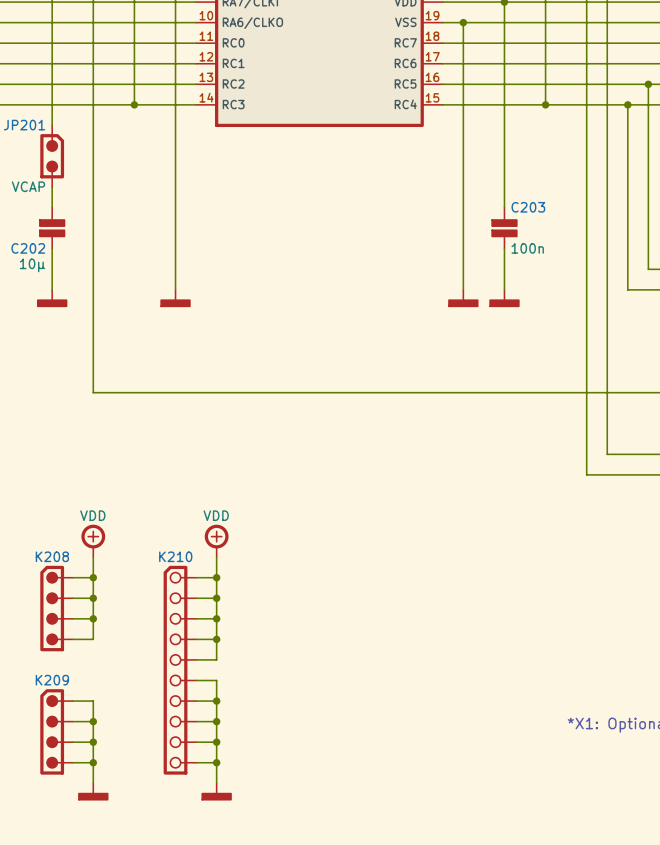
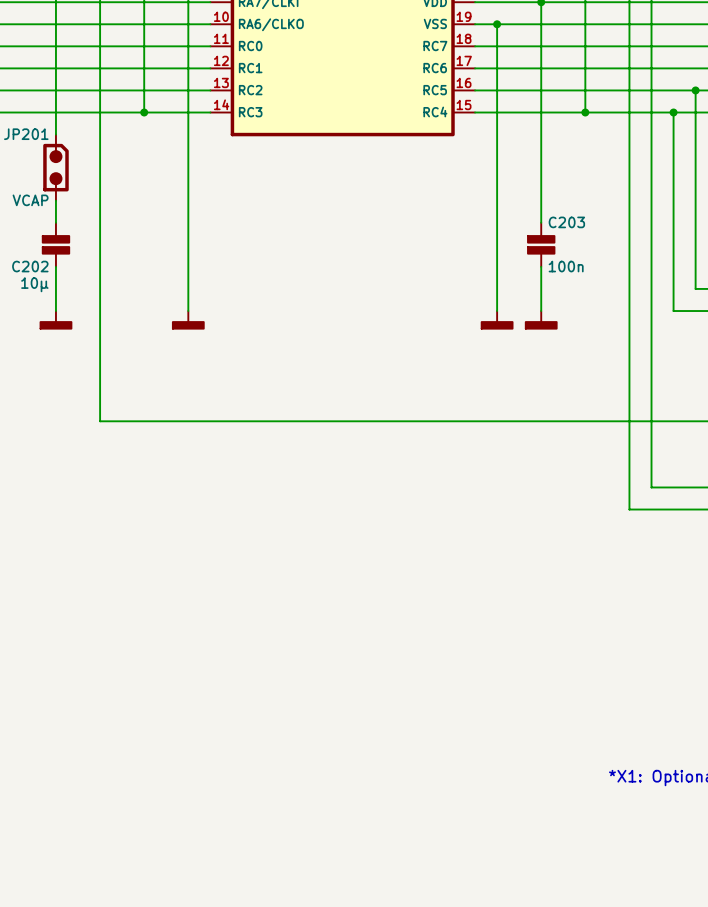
power symbol: (93, 540) -> none
power symbol: (216, 540) -> none
wire: (93, 557) (93, 639) (72, 639) -> none
wire: (216, 557) (216, 659) (196, 659) -> none
wire: (72, 577) (93, 577) -> none
junction: (93, 577) -> none
wire: (196, 577) (216, 577) -> none
junction: (216, 577) -> none
wire: (72, 598) (93, 598) -> none
junction: (93, 598) -> none
wire: (196, 598) (216, 598) -> none
junction: (216, 598) -> none
K208: (56, 608) -> none
wire: (72, 618) (93, 618) -> none
junction: (93, 618) -> none
wire: (196, 618) (216, 618) -> none
junction: (216, 618) -> none
wire: (196, 639) (216, 639) -> none
junction: (216, 639) -> none
K210: (179, 670) -> none
wire: (196, 680) (216, 680) (216, 783) -> none
wire: (72, 701) (93, 701) (93, 783) -> none
wire: (196, 701) (216, 701) -> none
junction: (216, 701) -> none
wire: (72, 721) (93, 721) -> none
junction: (93, 721) -> none
wire: (196, 721) (216, 721) -> none
junction: (216, 721) -> none
K209: (56, 731) -> none
wire: (72, 742) (93, 742) -> none
junction: (93, 742) -> none
wire: (196, 742) (216, 742) -> none
junction: (216, 742) -> none
wire: (72, 762) (93, 762) -> none
junction: (93, 762) -> none
wire: (196, 762) (216, 762) -> none
junction: (216, 762) -> none
power symbol: (93, 791) -> none
power symbol: (216, 791) -> none

